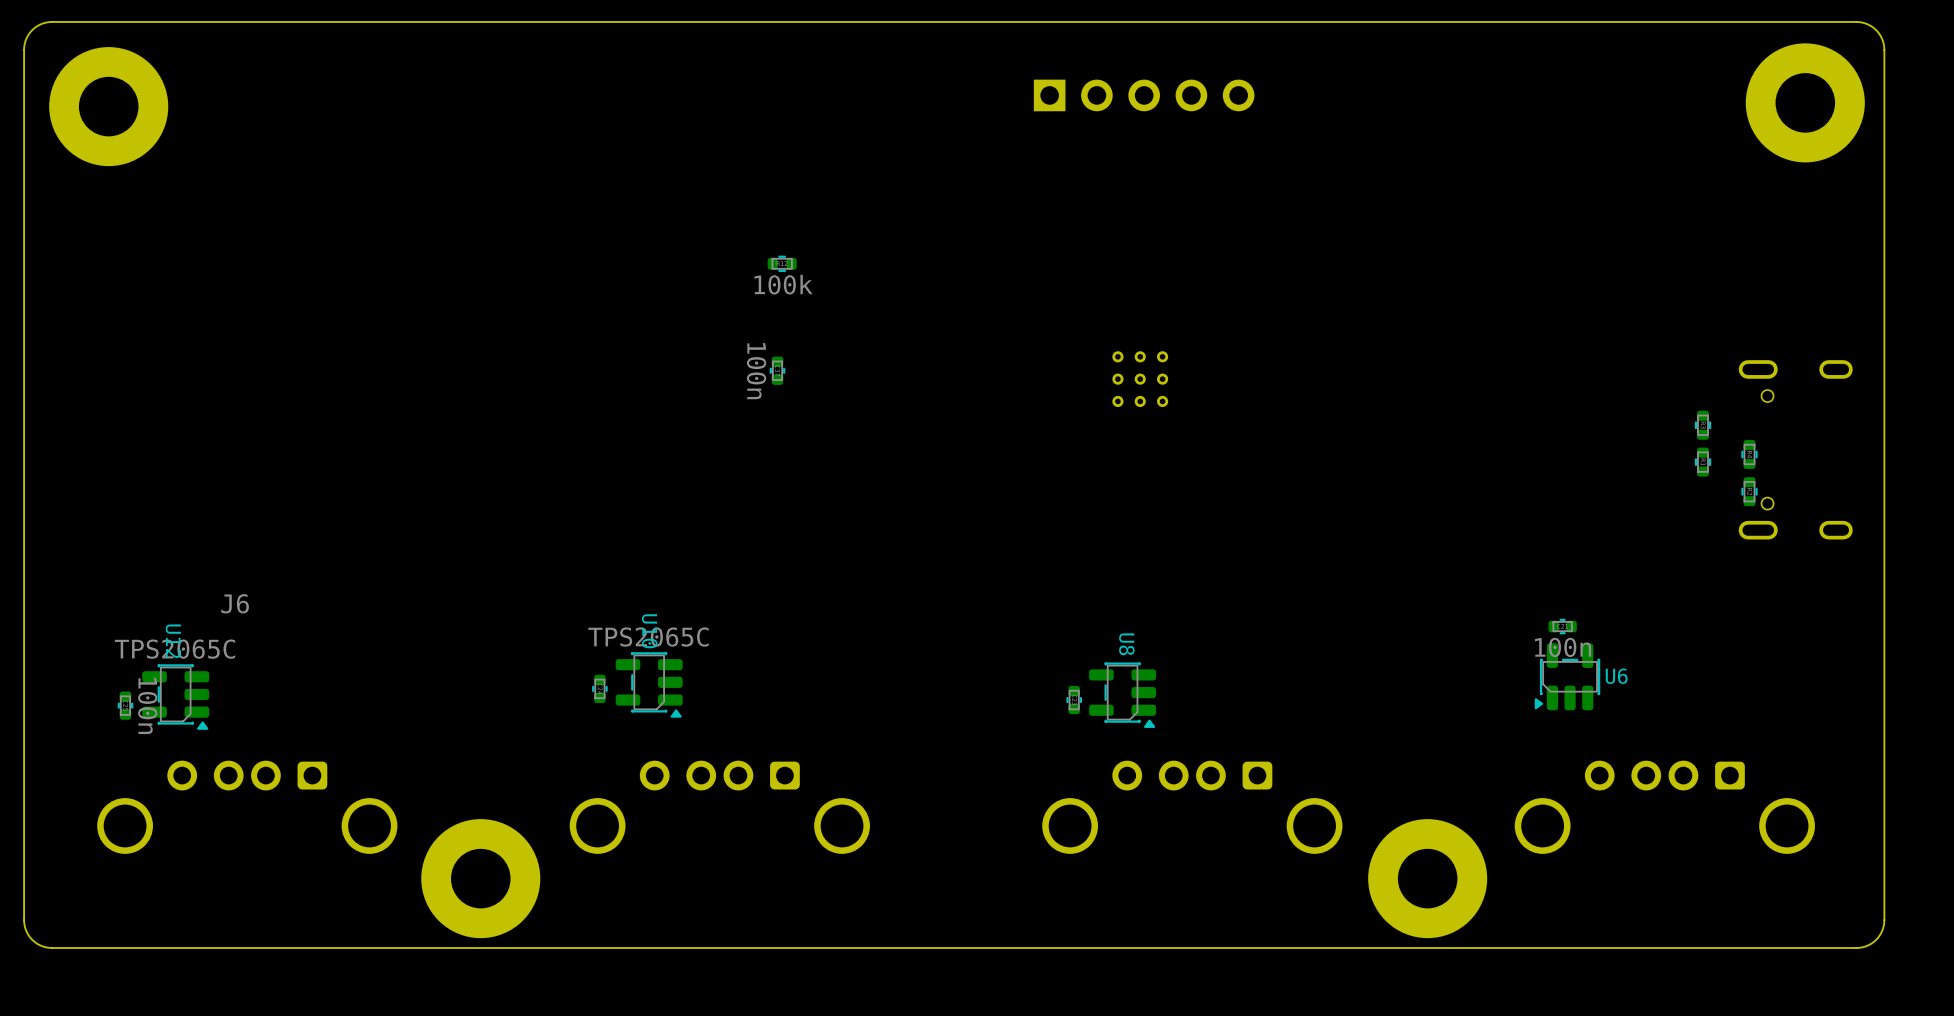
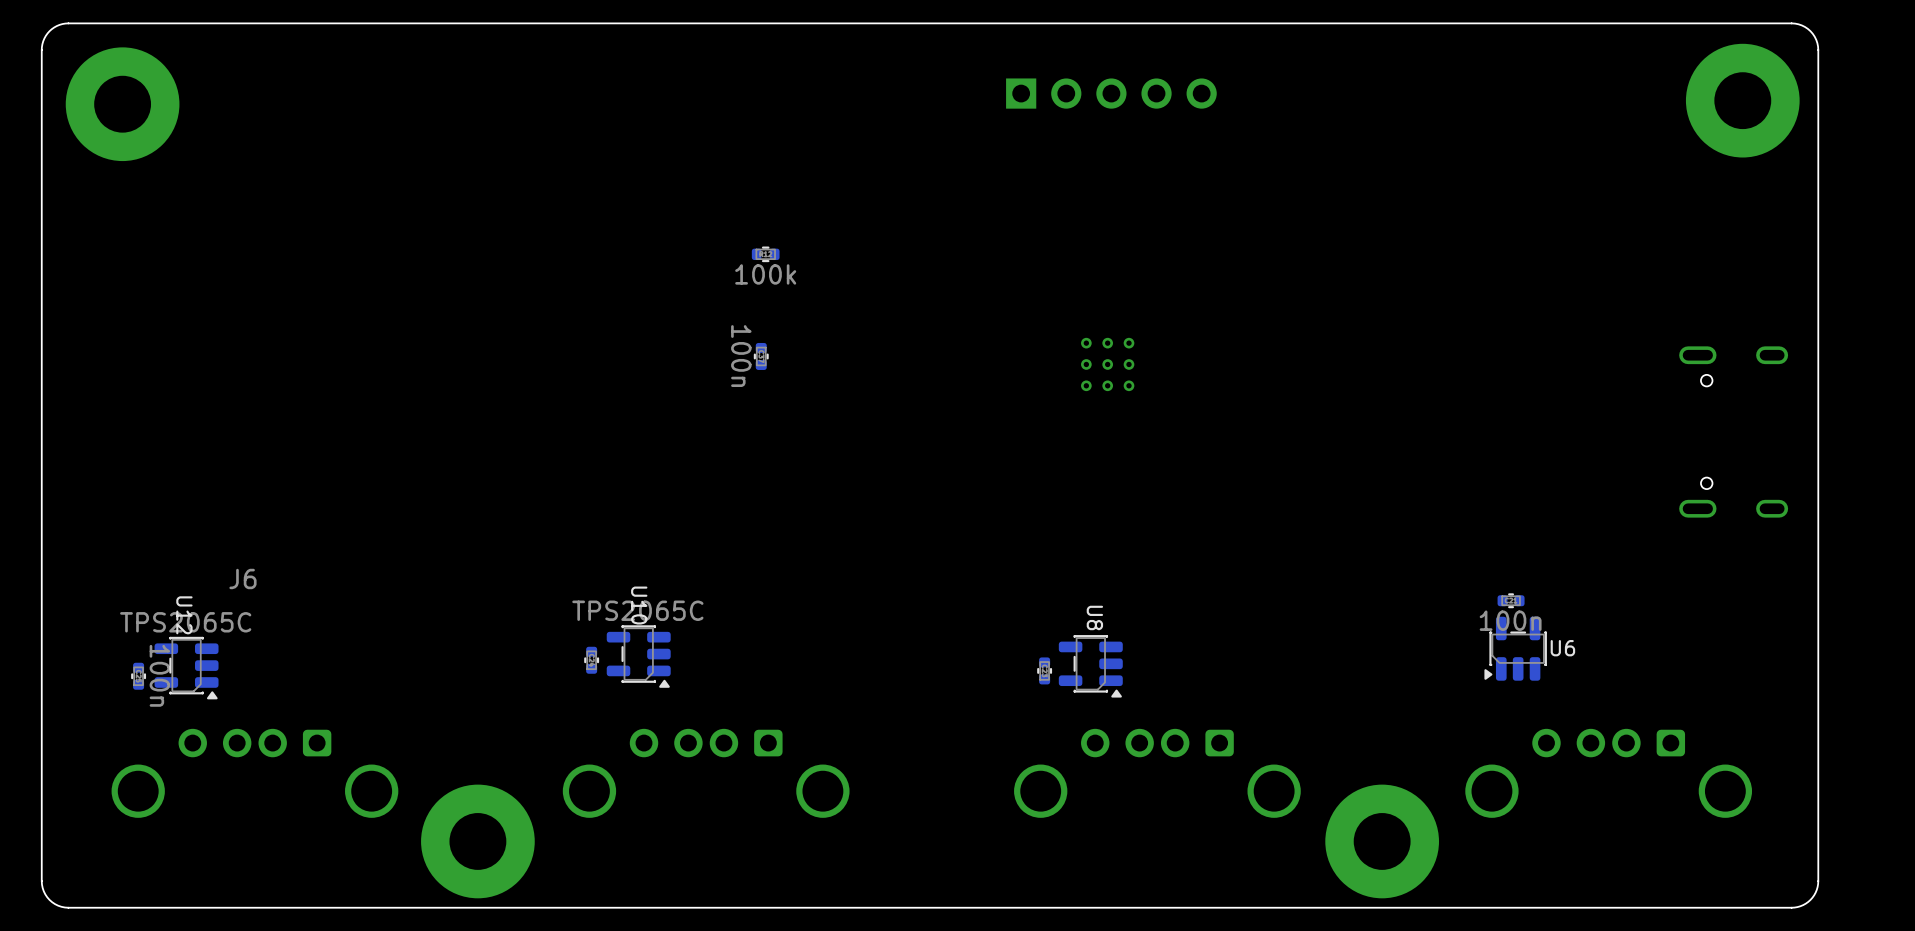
part: (1702, 425) -> none
part: (1749, 454) -> none
part: (1702, 462) -> none
part: (1749, 491) -> none

